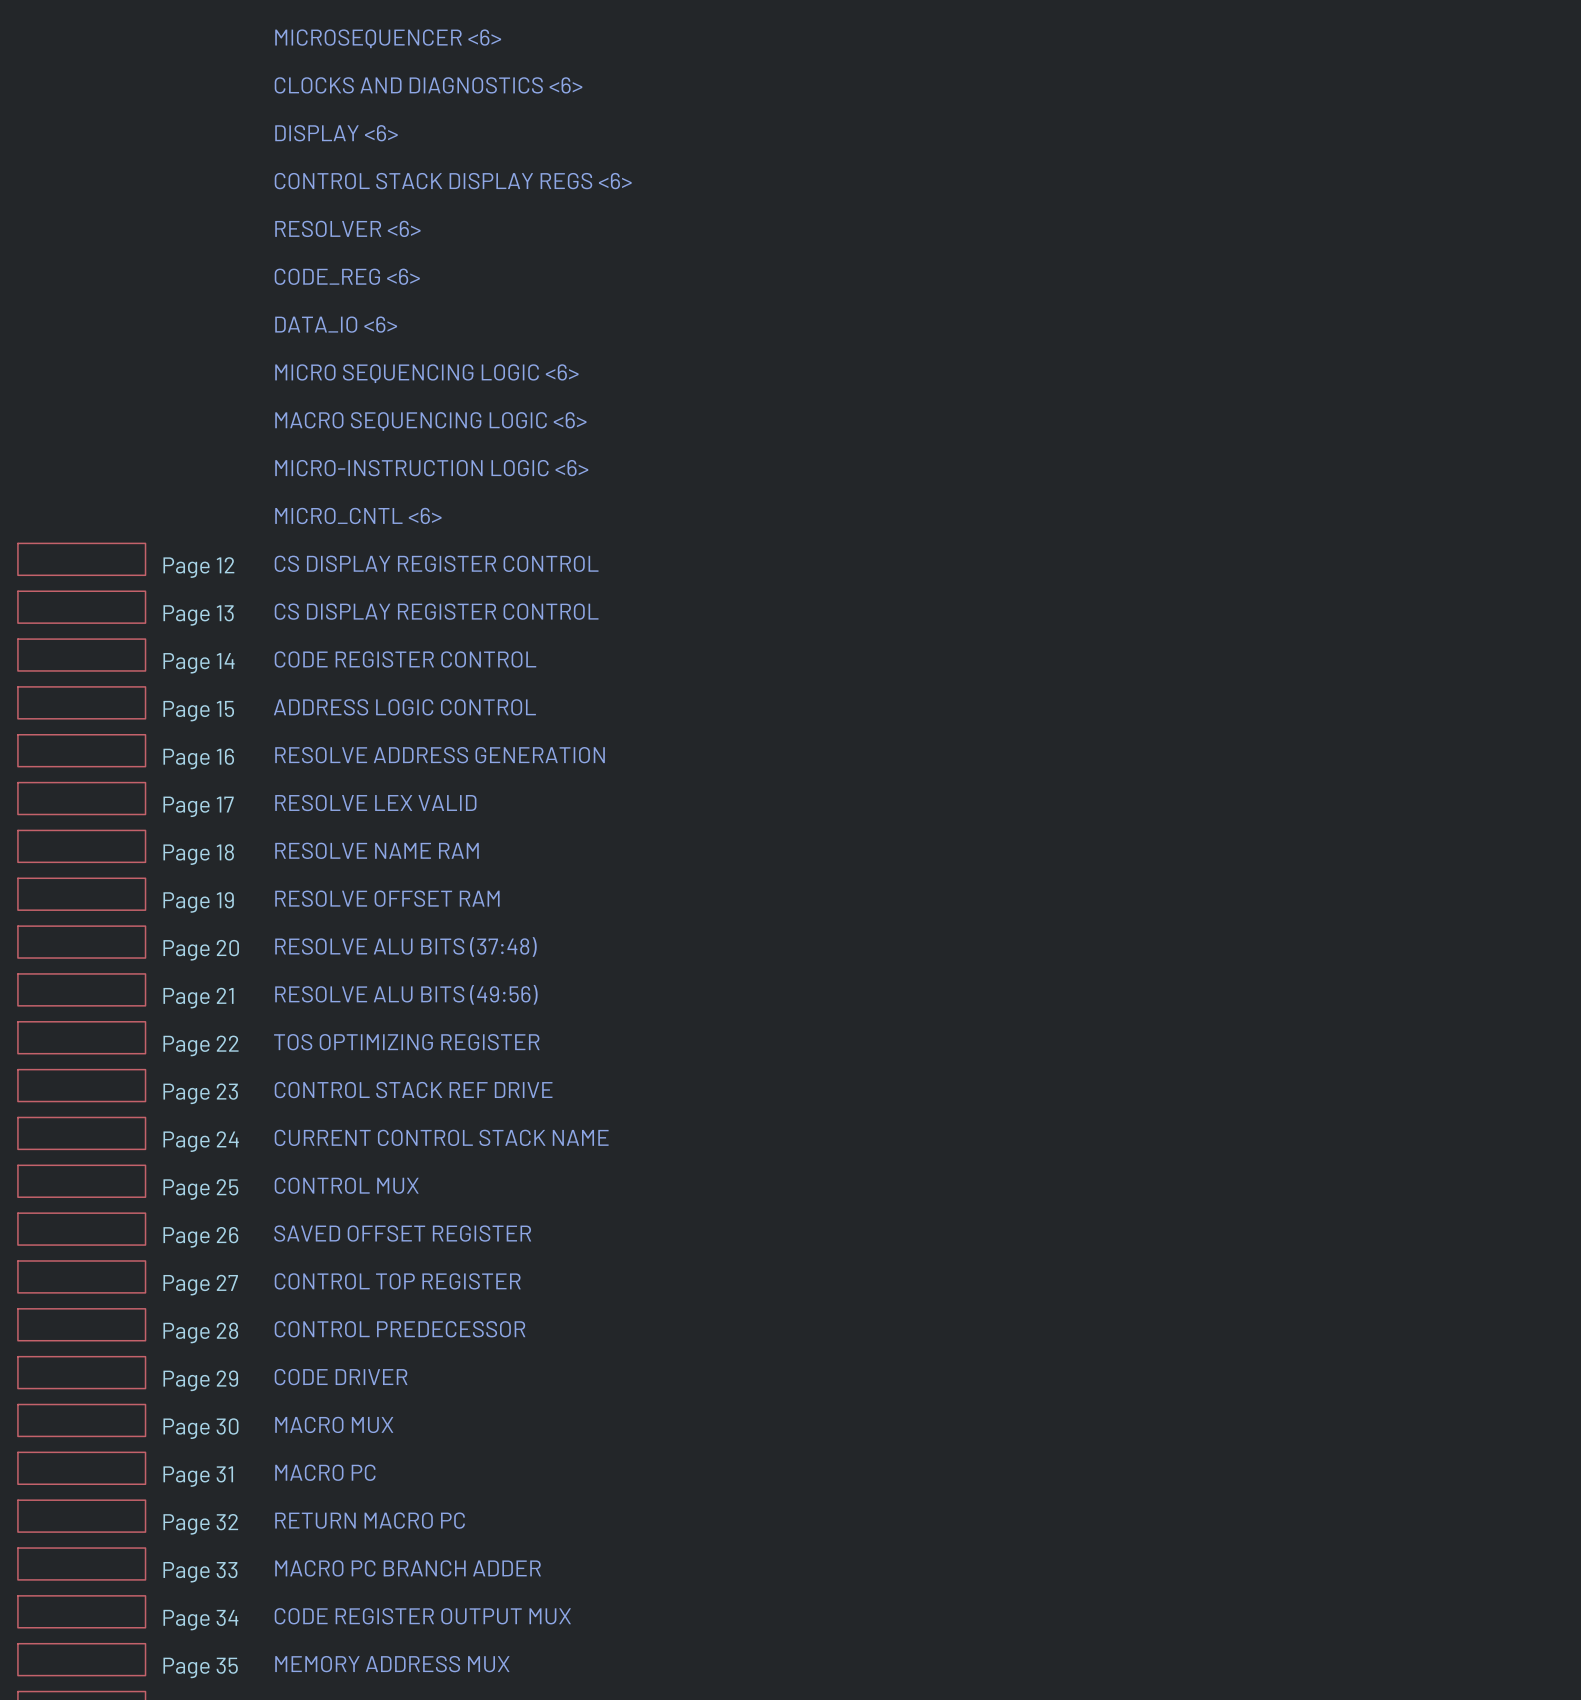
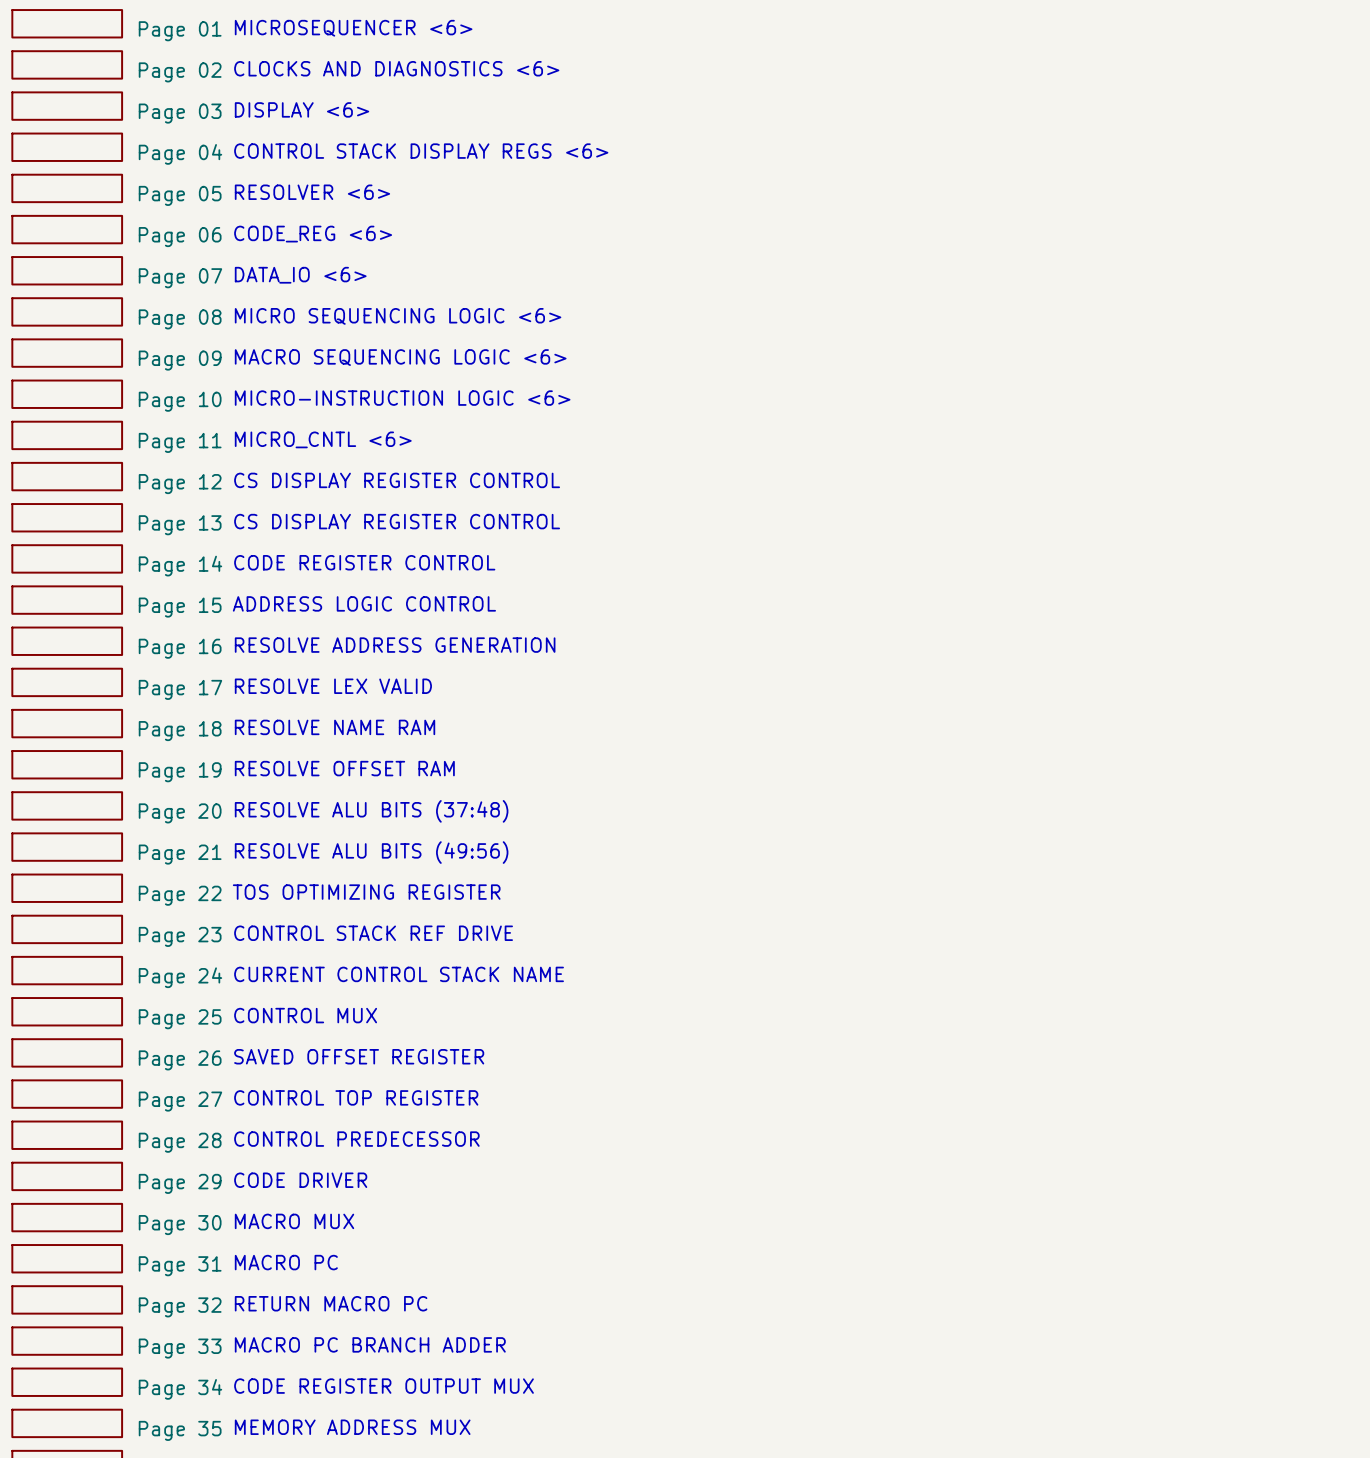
sheet Page 01: none -> (67, 23)
sheet Page 02: none -> (67, 64)
sheet Page 03: none -> (67, 106)
sheet Page 04: none -> (67, 147)
sheet Page 05: none -> (67, 188)
sheet Page 06: none -> (67, 229)
sheet Page 07: none -> (67, 270)
sheet Page 08: none -> (67, 311)
sheet Page 09: none -> (67, 353)
sheet Page 10: none -> (67, 394)
sheet Page 11: none -> (67, 435)

